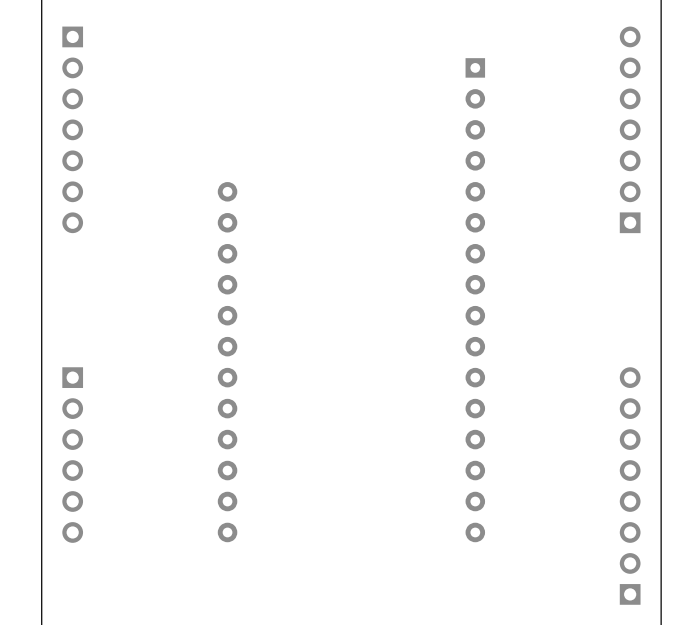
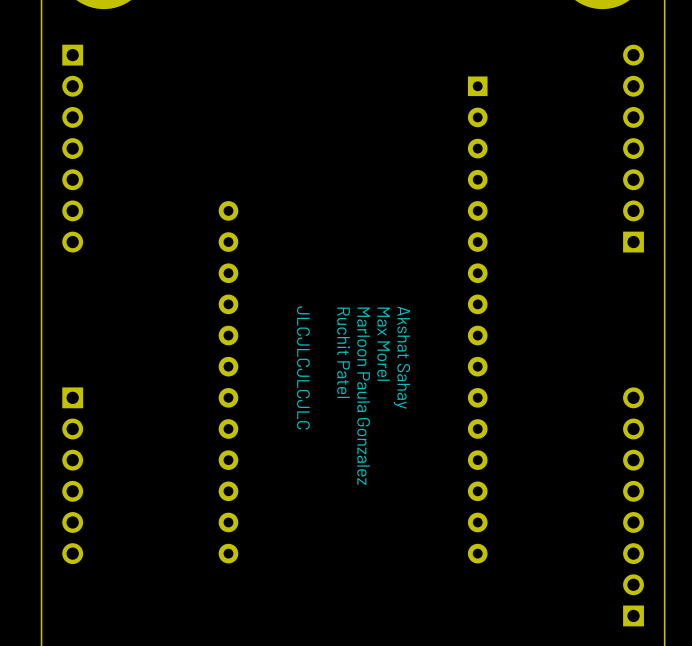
text: none -> Max Morel (383, 344)
text: none -> Ruchit Patel (343, 352)
text: none -> Akshat Sahay (402, 357)
text: none -> JLCJLCJLCJLC (303, 367)
text: none -> Marloon Paula Gonzalez (363, 396)

